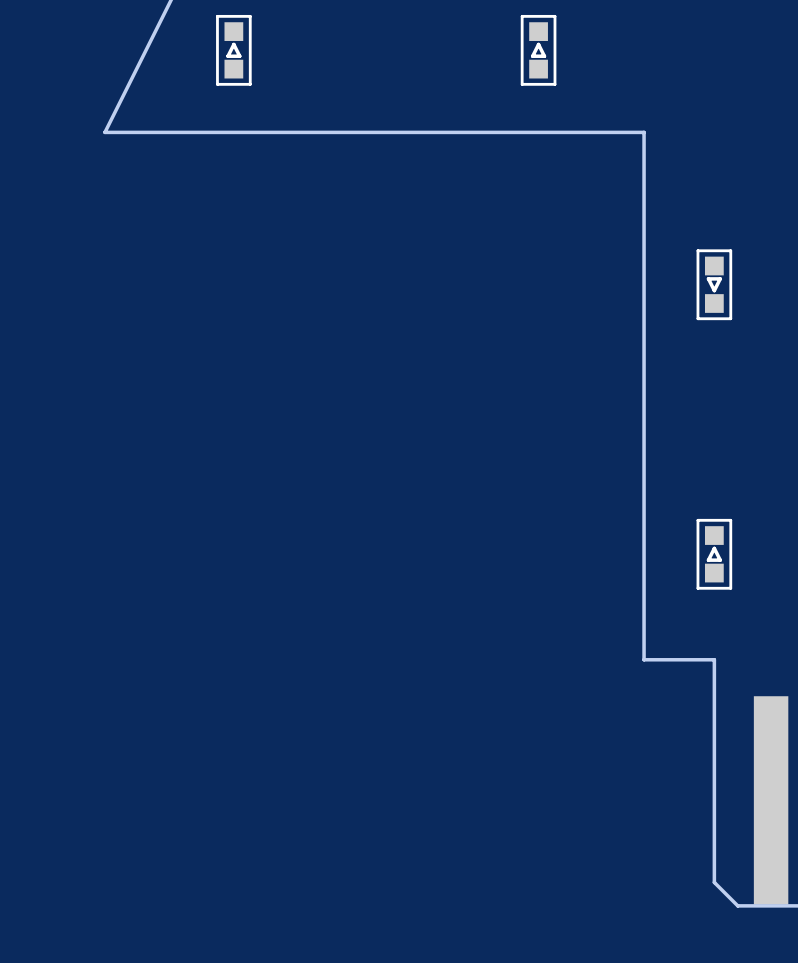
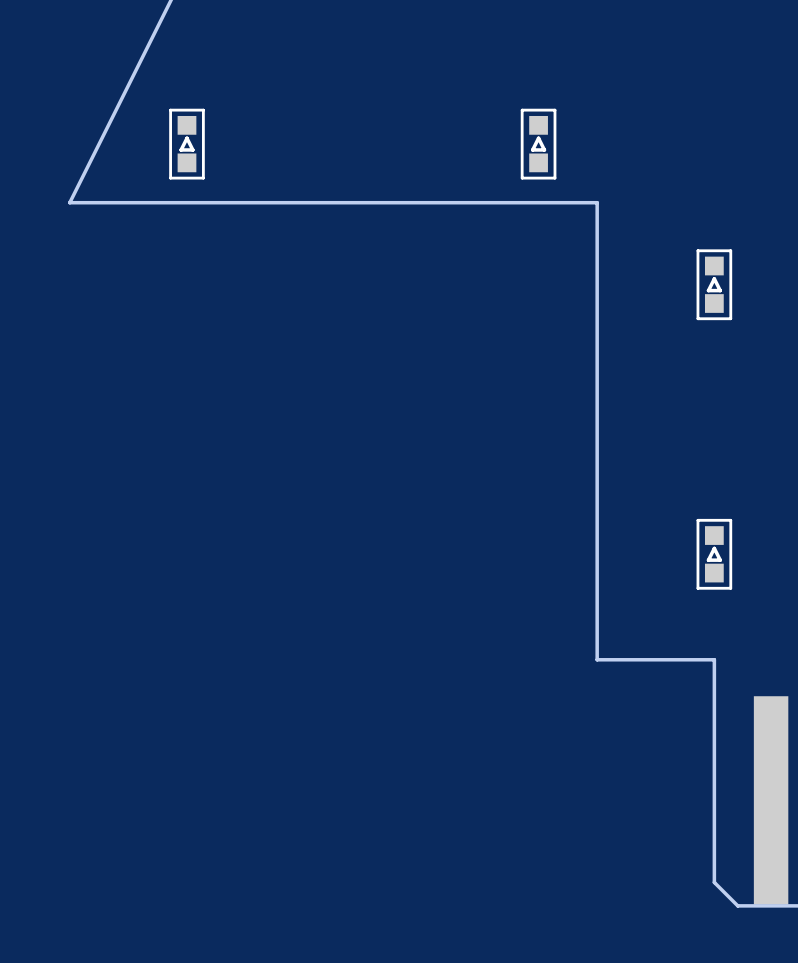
part position: (233, 50) -> (186, 144)
part position: (538, 50) -> (538, 144)
board edge: (104, 132) (644, 132) (644, 659) -> (104, 132) (69, 202) (597, 202) (597, 659) (644, 659)
part rotation: 0° (714, 284) -> 180° (714, 284)

